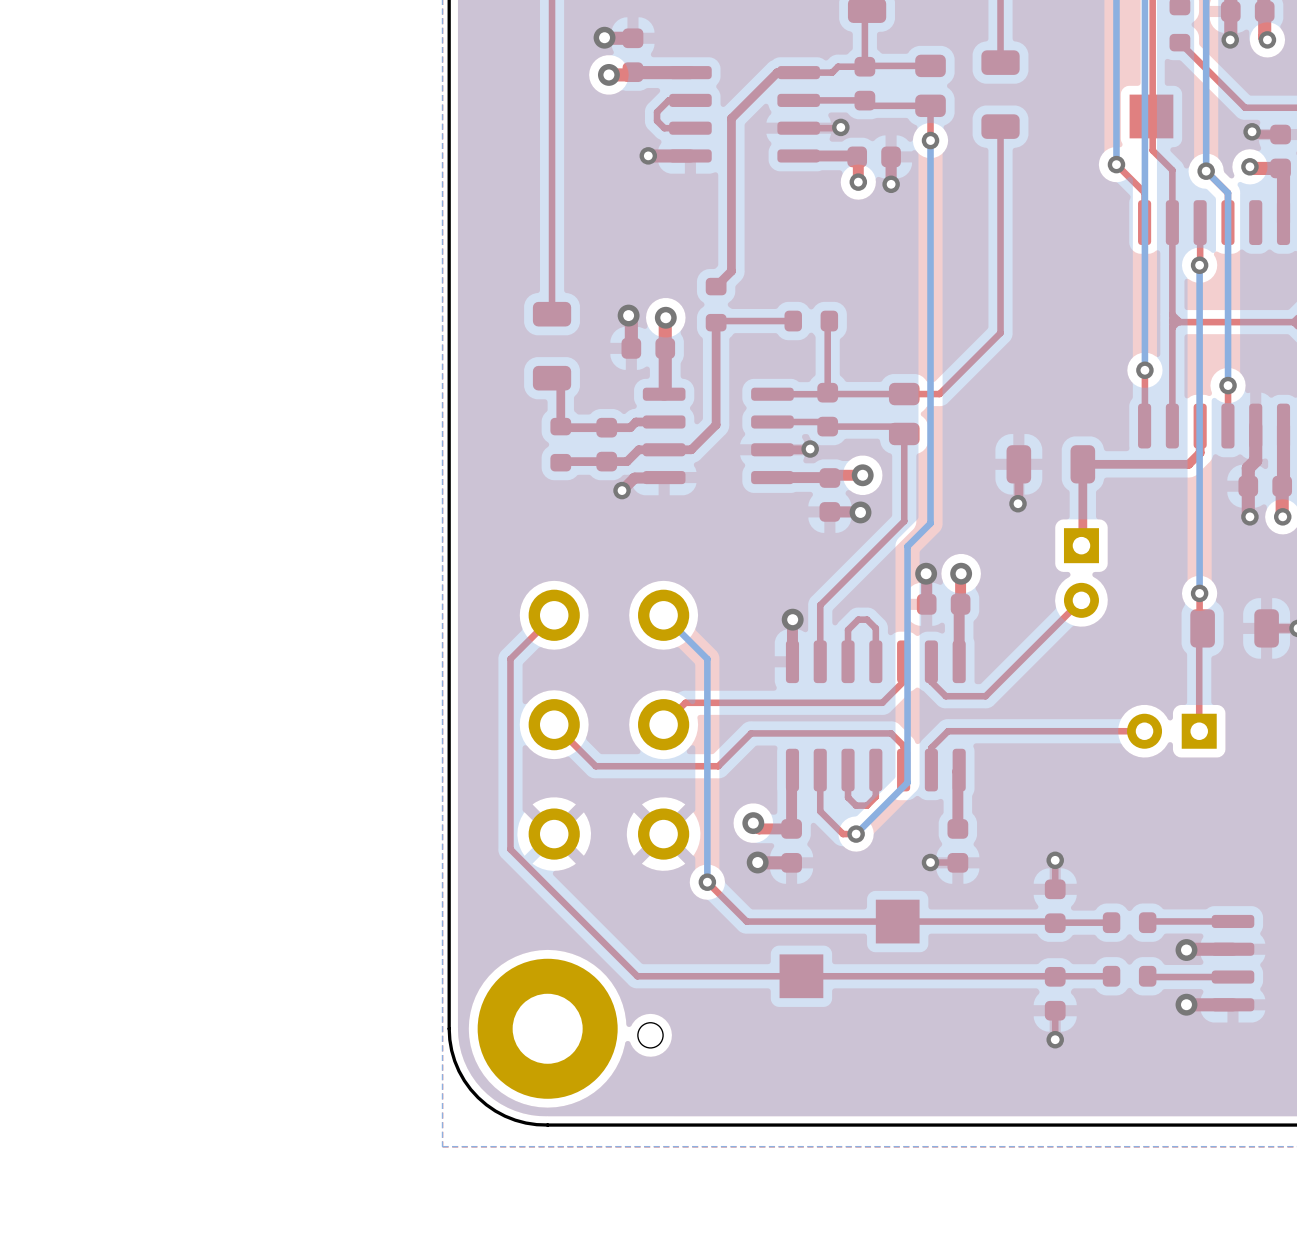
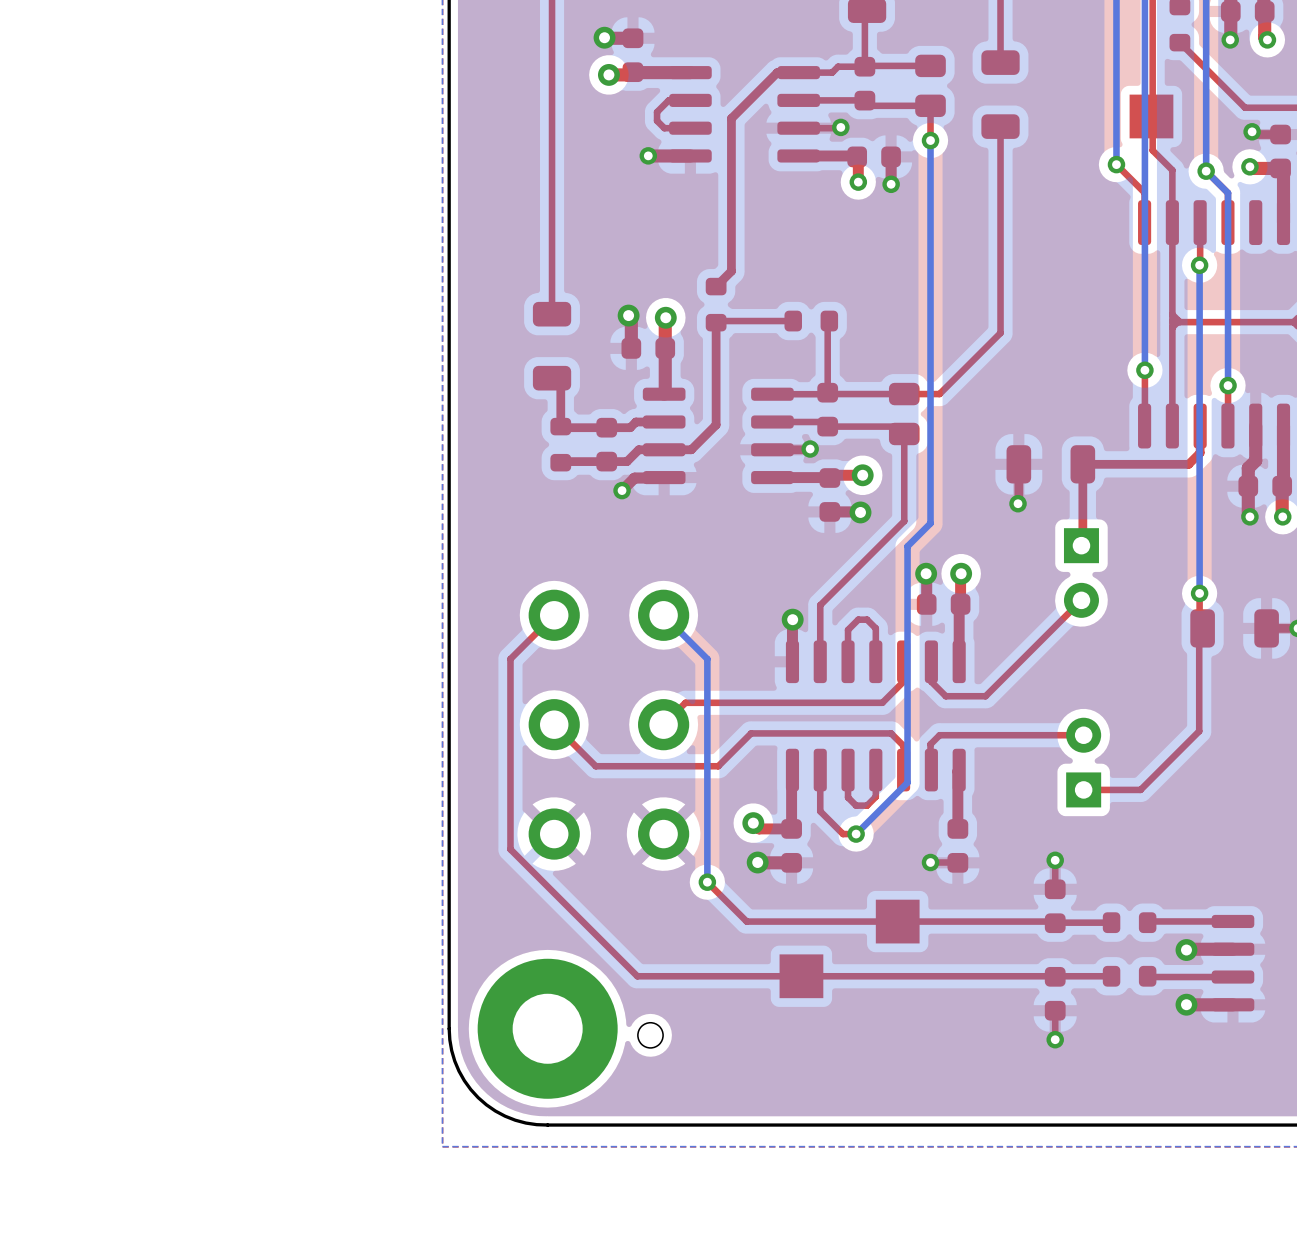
top track: (1144, 731) (948, 731) (931, 747) (931, 770) -> (1083, 735) (939, 735) (930, 744) (931, 770)
part rotation: 0° (1171, 731) -> 90° clockwise (1083, 762)
part position: (1171, 731) -> (1083, 762)
top track: none -> (1199, 731) (1140, 789) (1083, 789)

